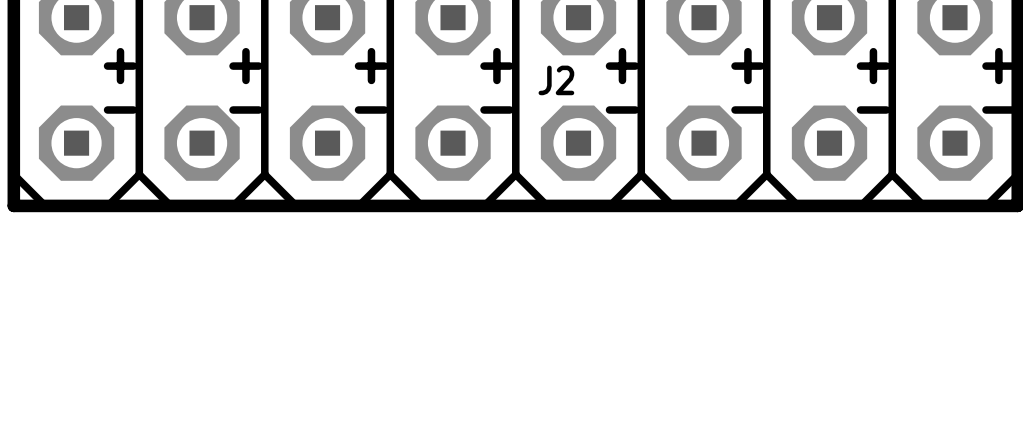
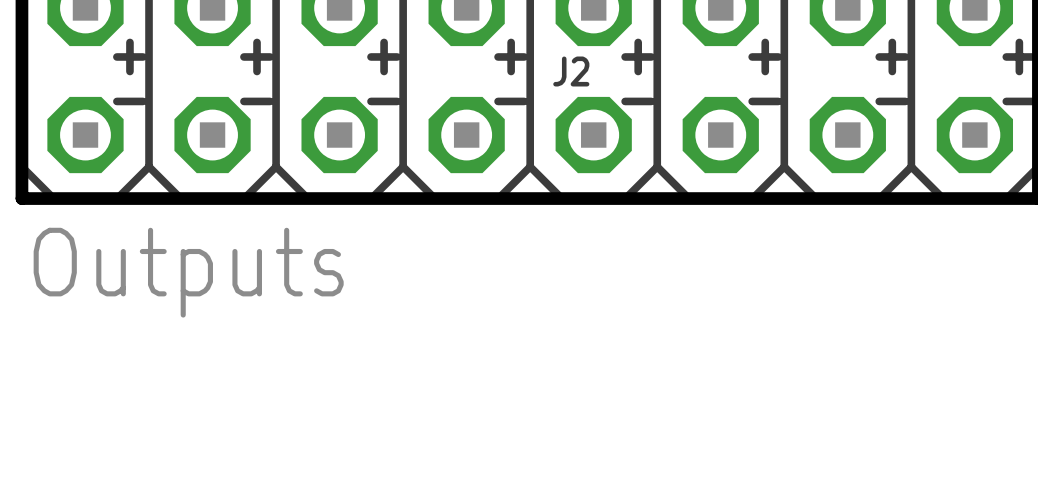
J2 value: none -> Outputs (188, 272)

